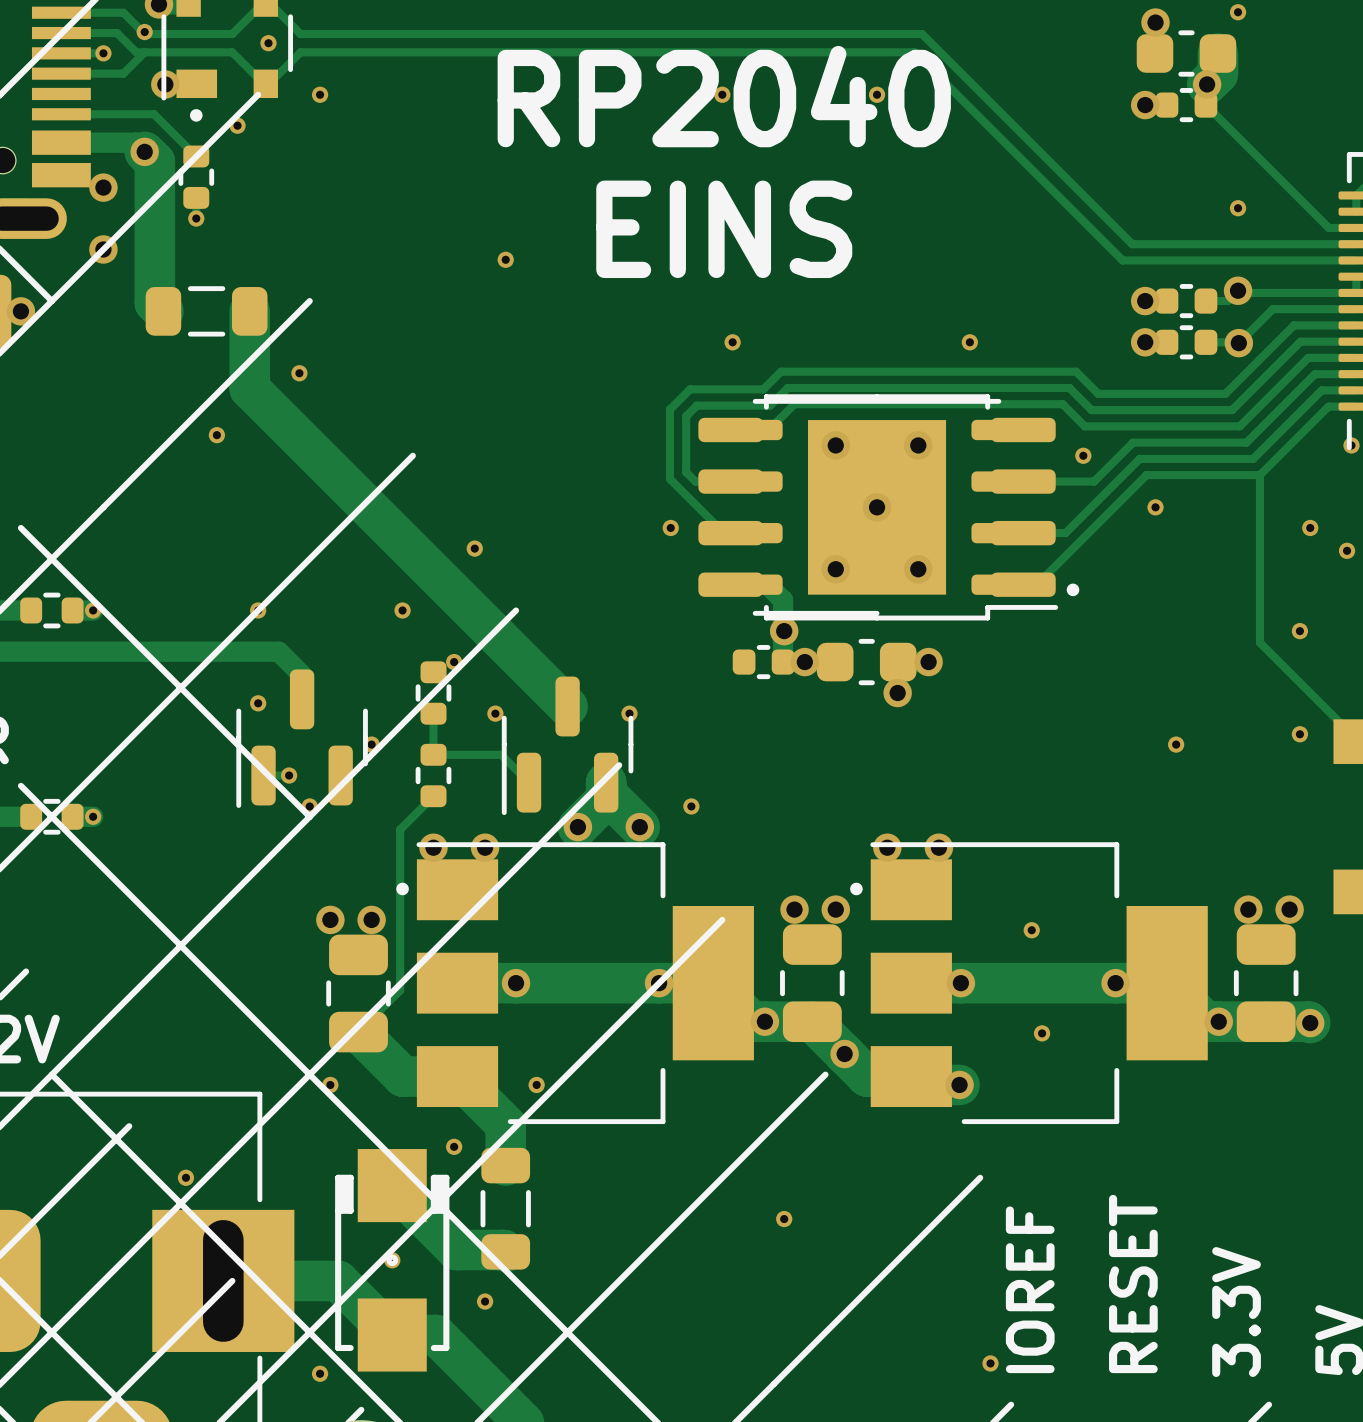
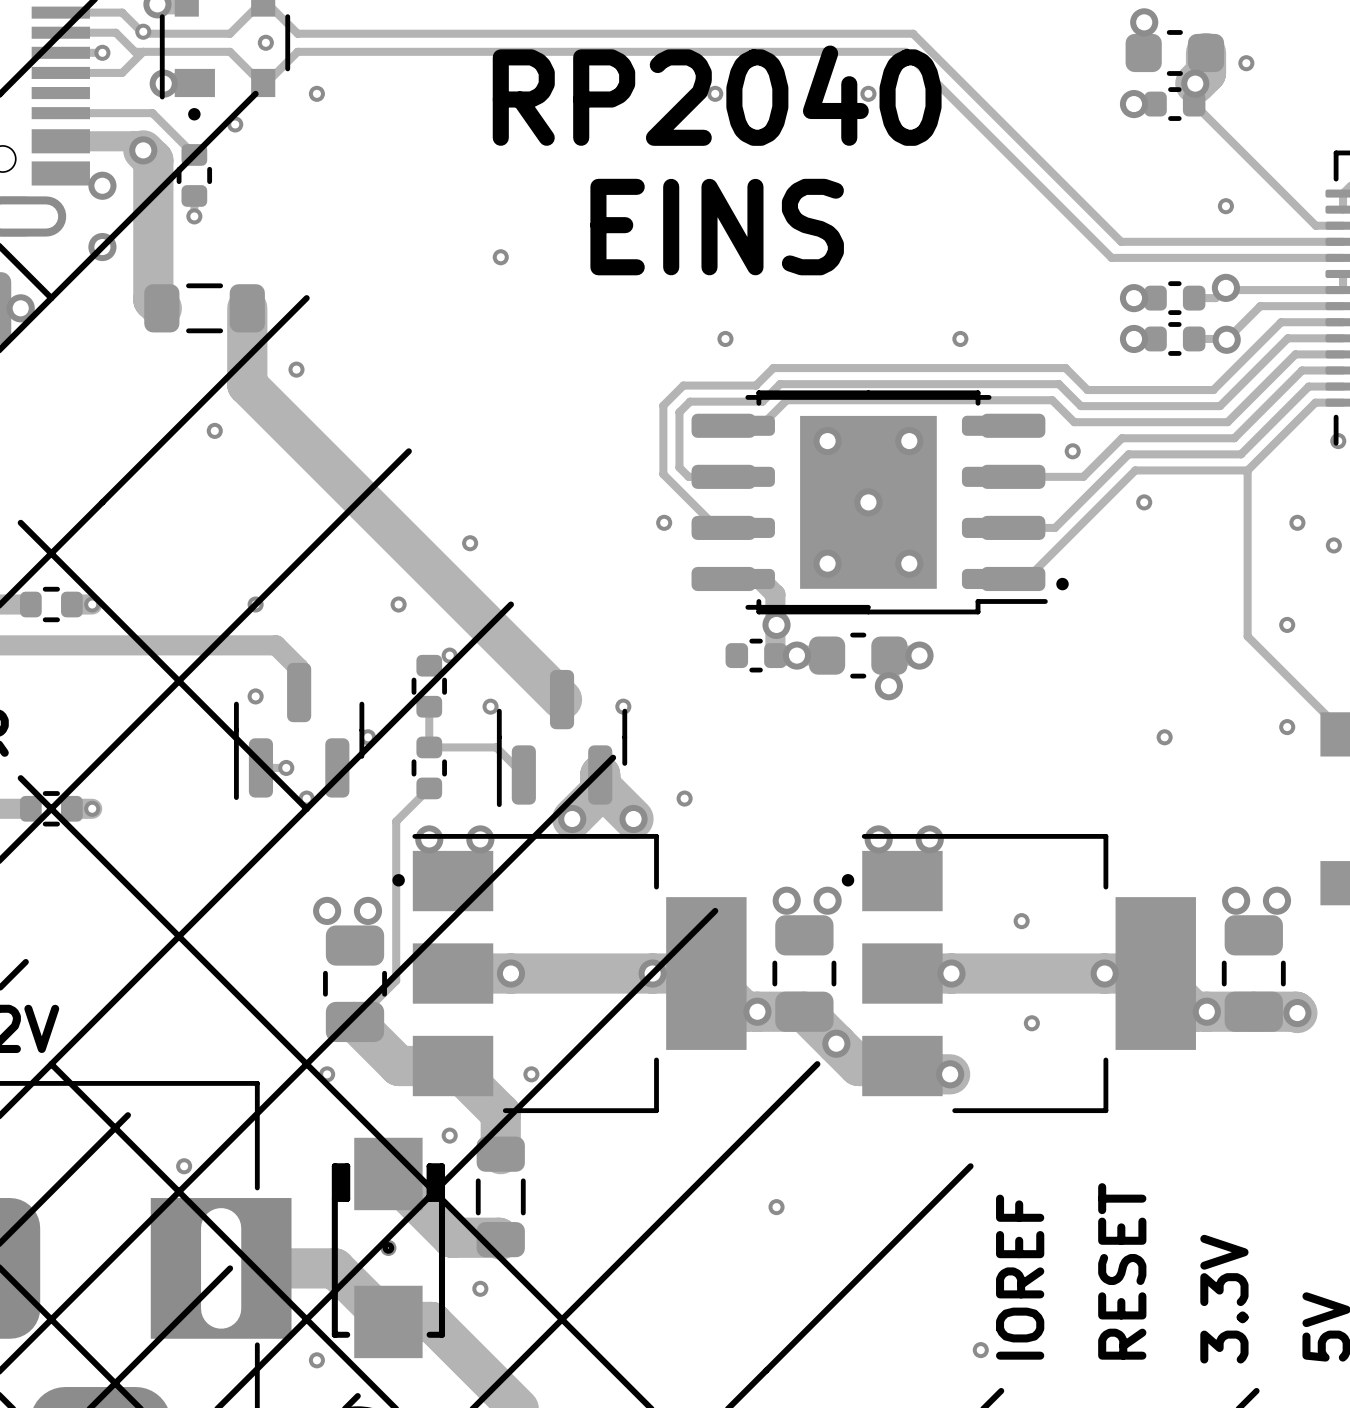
via position: (1238, 12) -> (1246, 63)

